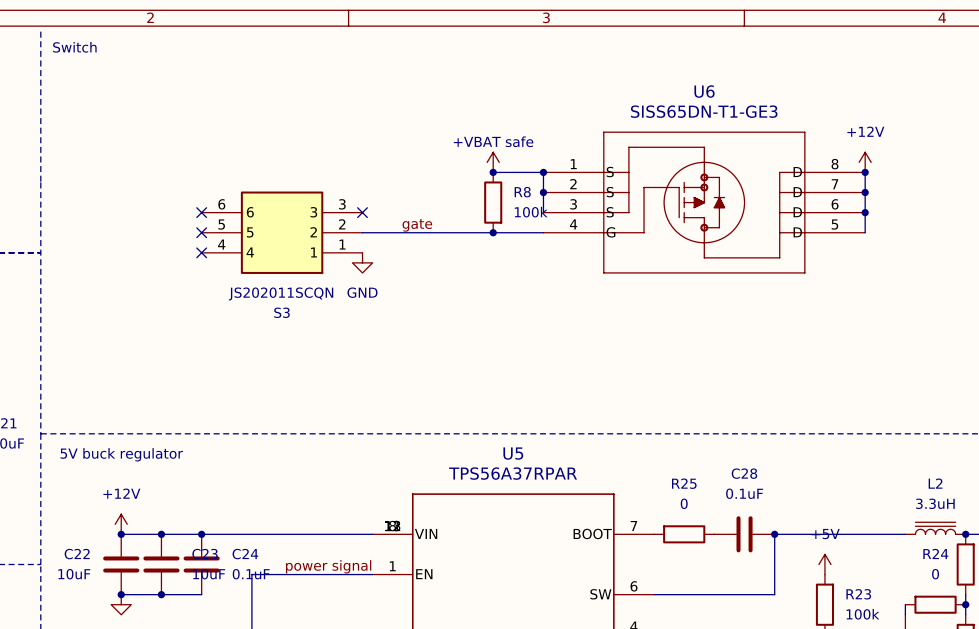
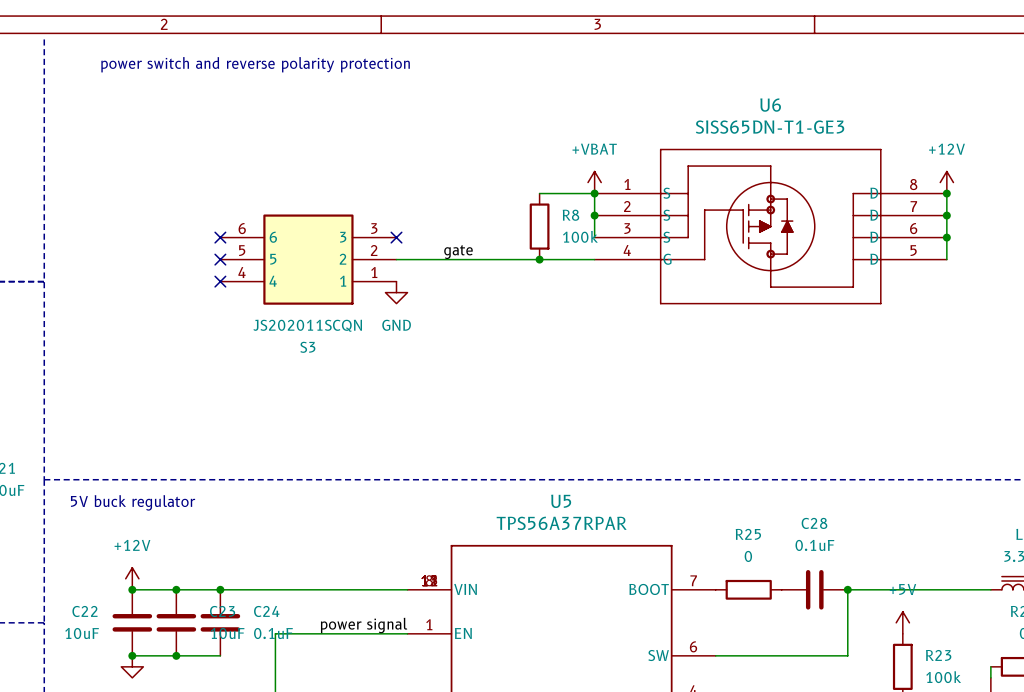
text: Switch (74, 47) -> none
text: none -> power switch and reverse polarity protection (255, 64)
power symbol: +VBAT safe (493, 162) -> none
power symbol: none -> +VBAT (594, 182)
junction: (493, 172) -> none

